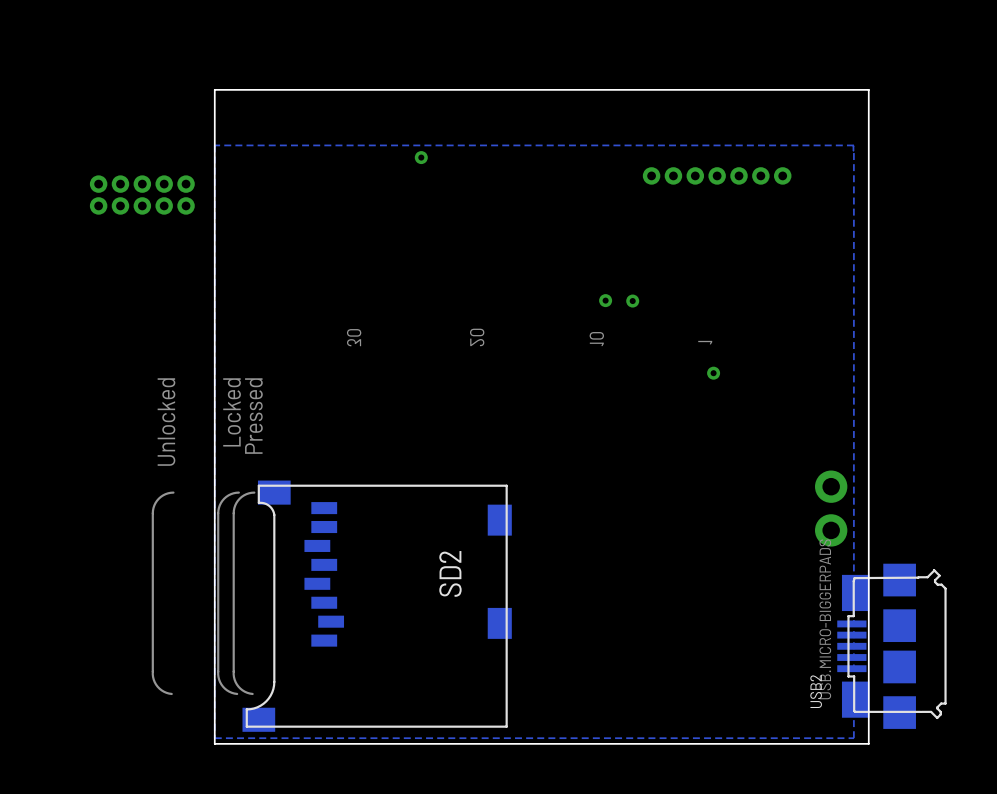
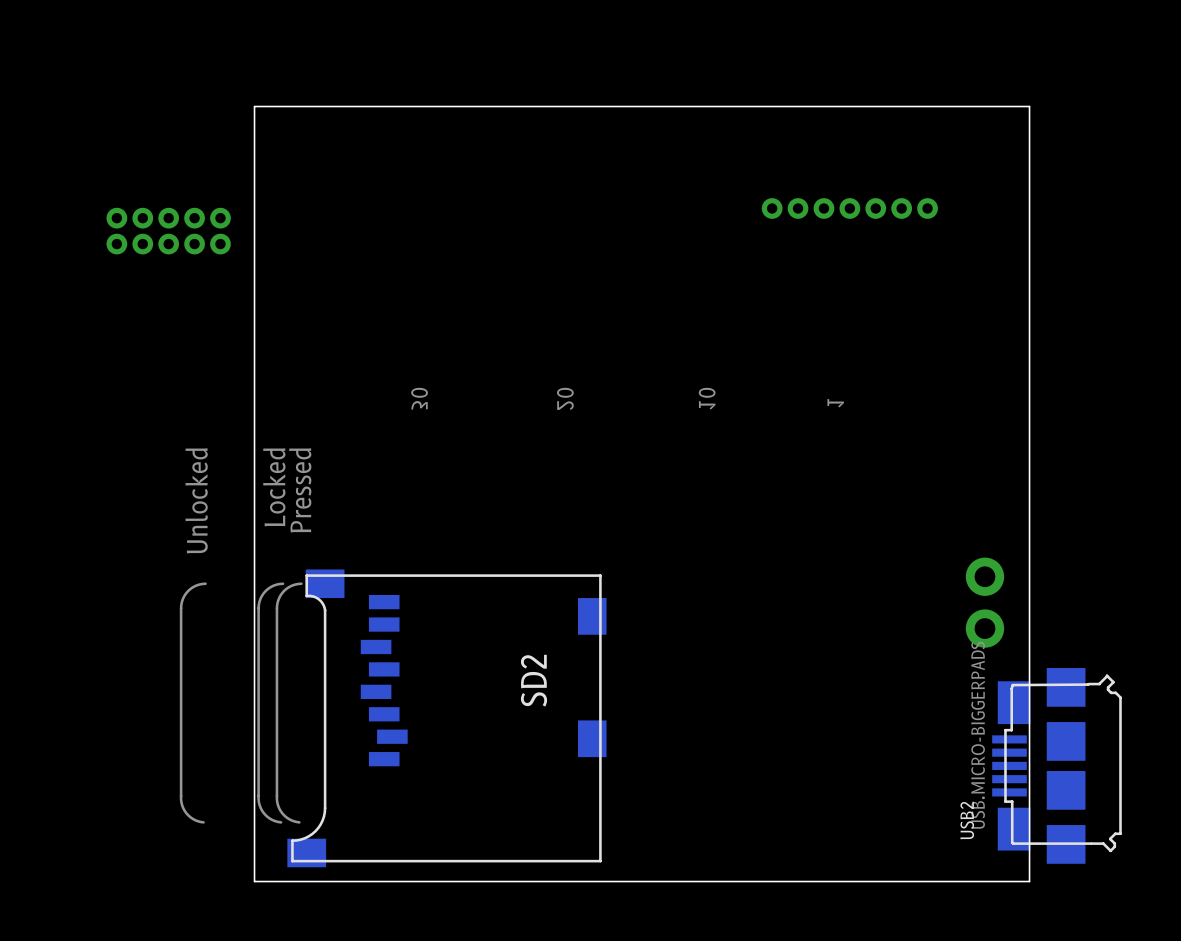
zone outline: (853, 145) (214, 145) (214, 738) (853, 738) (853, 145) -> none
via: (421, 157) -> none
via: (605, 300) -> none
via: (632, 301) -> none
via: (713, 373) -> none

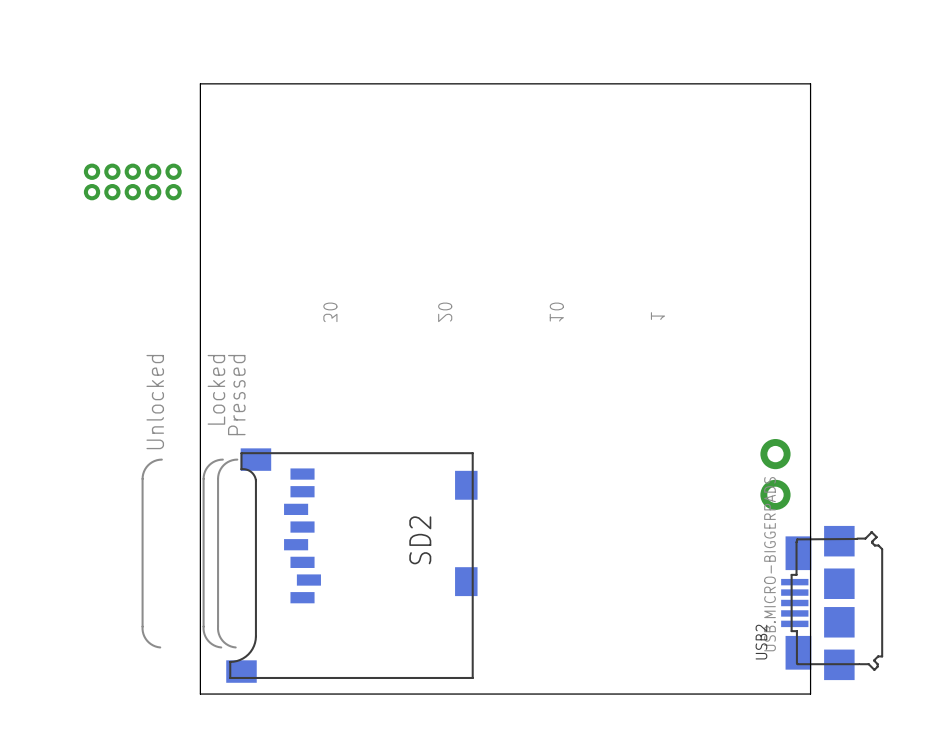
part: (849, 208) -> none

